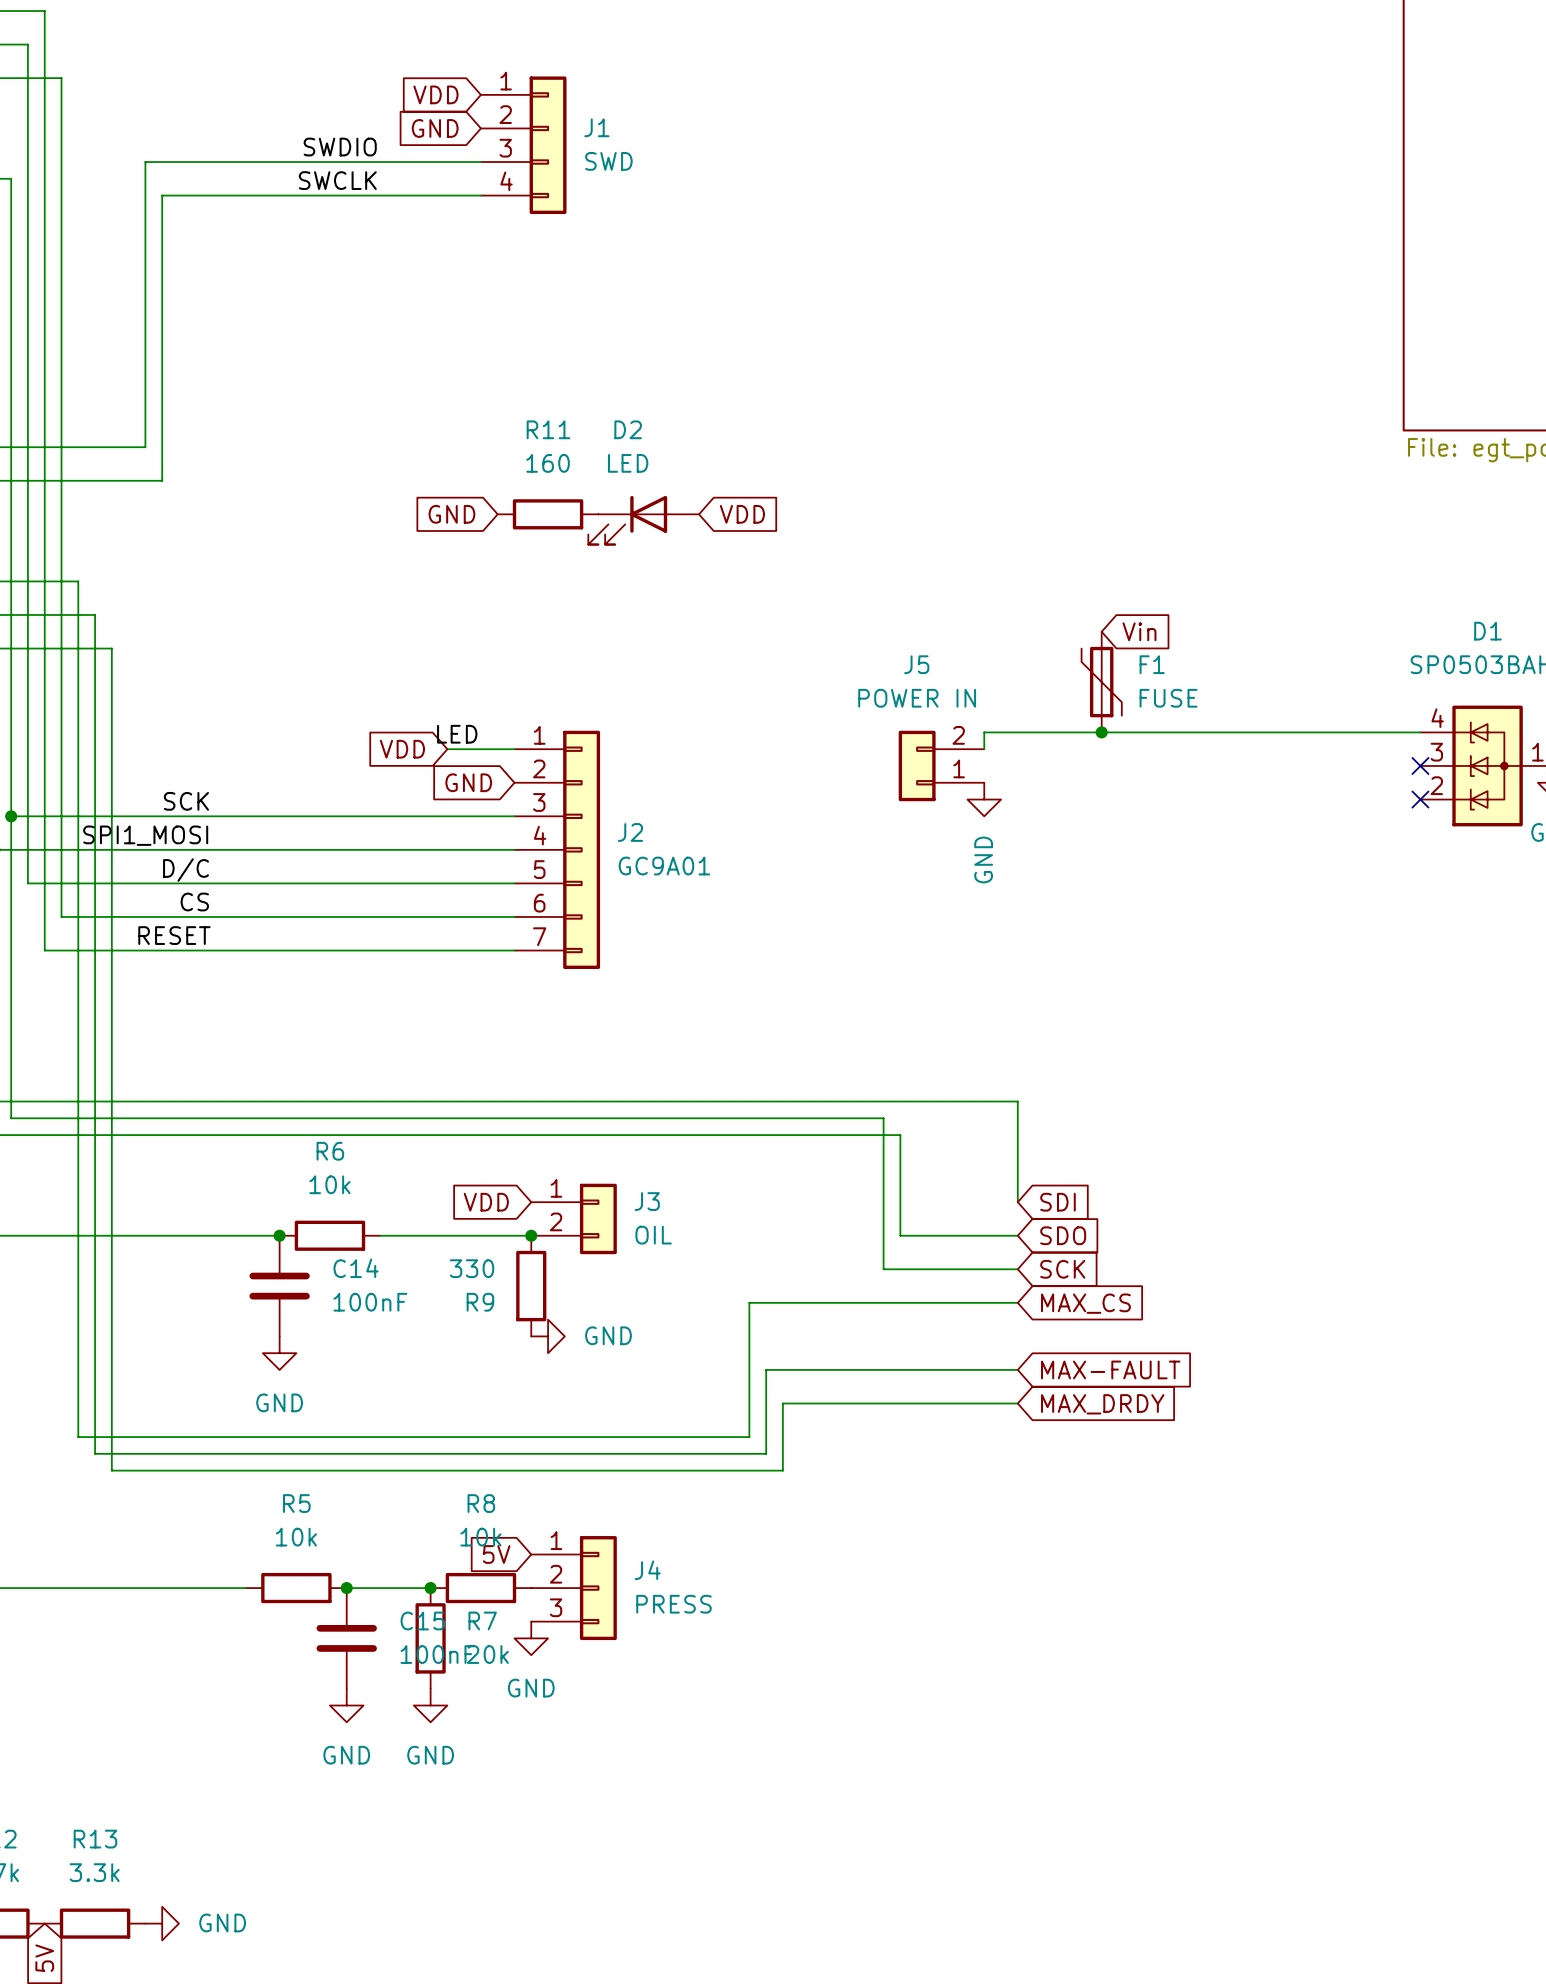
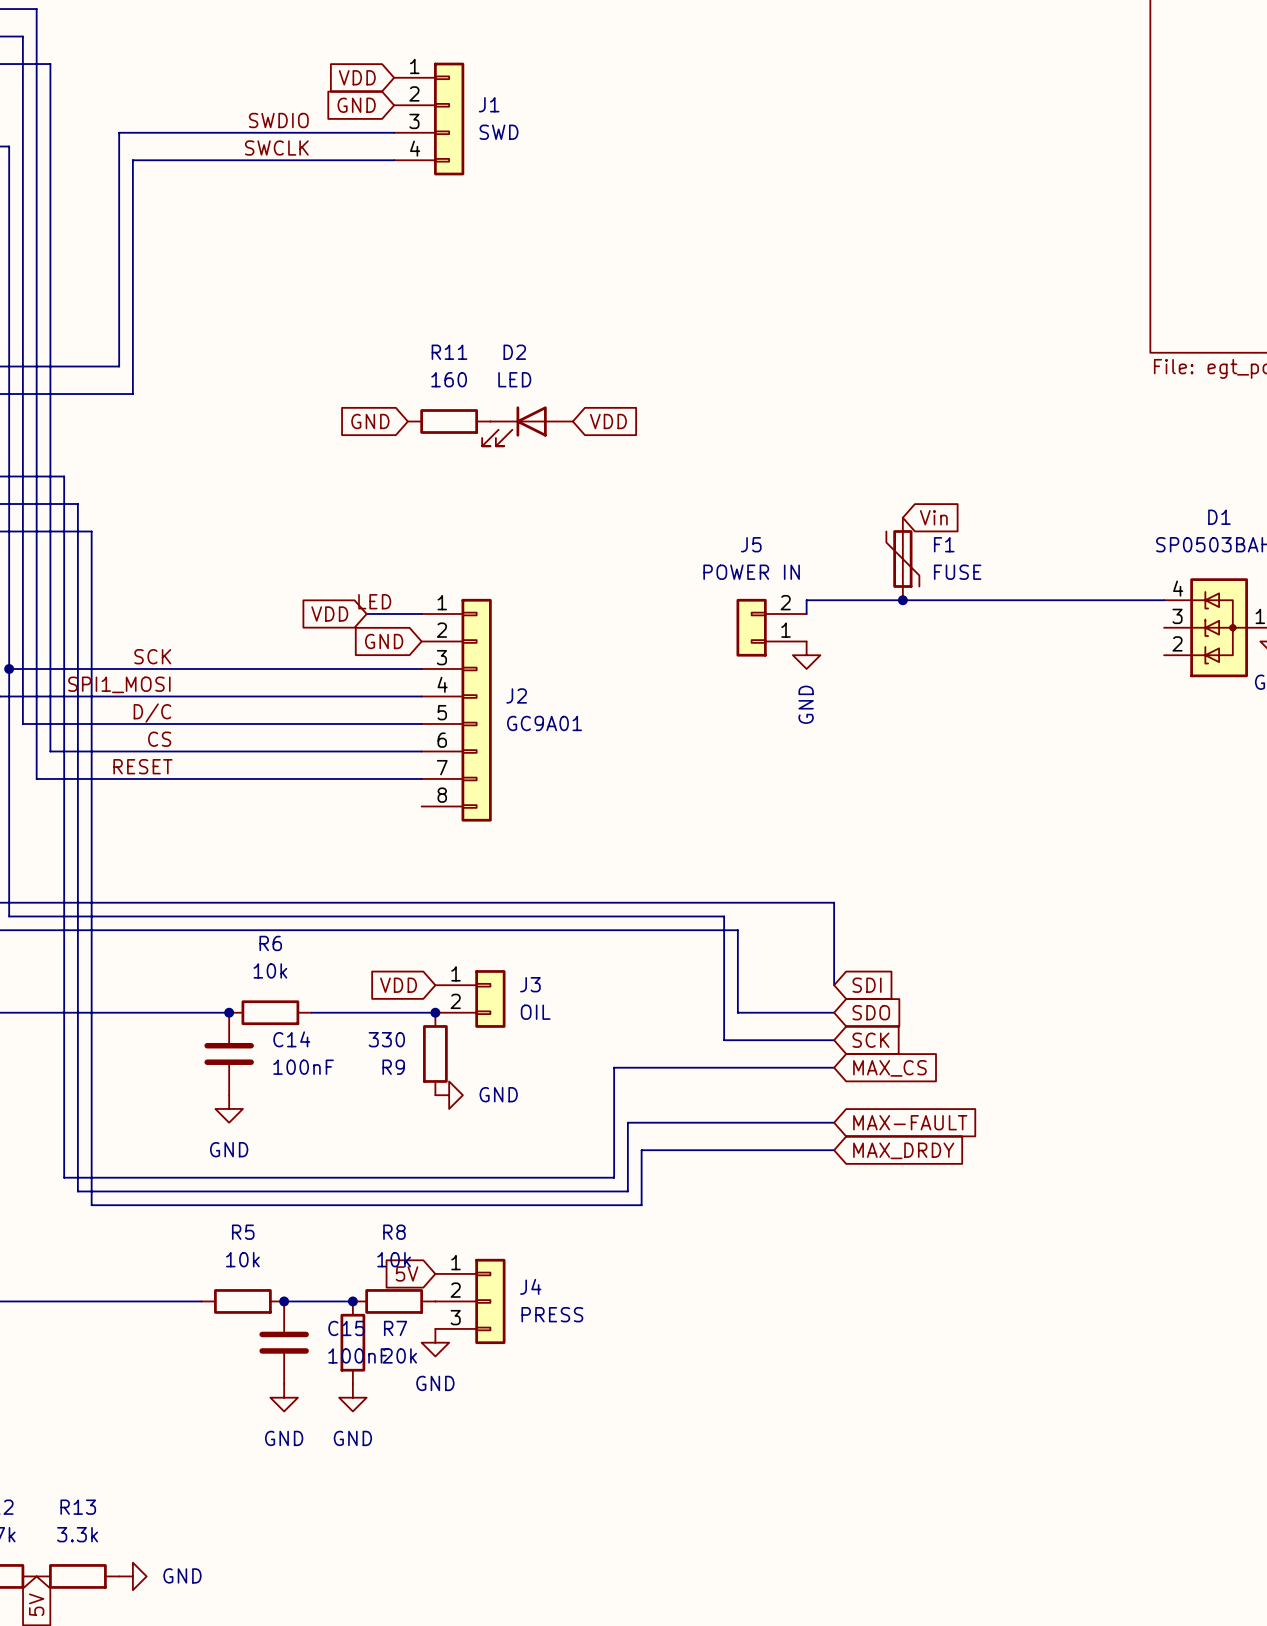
J2 symbol: [514, 730, 601, 969] -> [421, 598, 492, 822]
no-connect mark: (1420, 765) -> none
no-connect mark: (1420, 799) -> none

